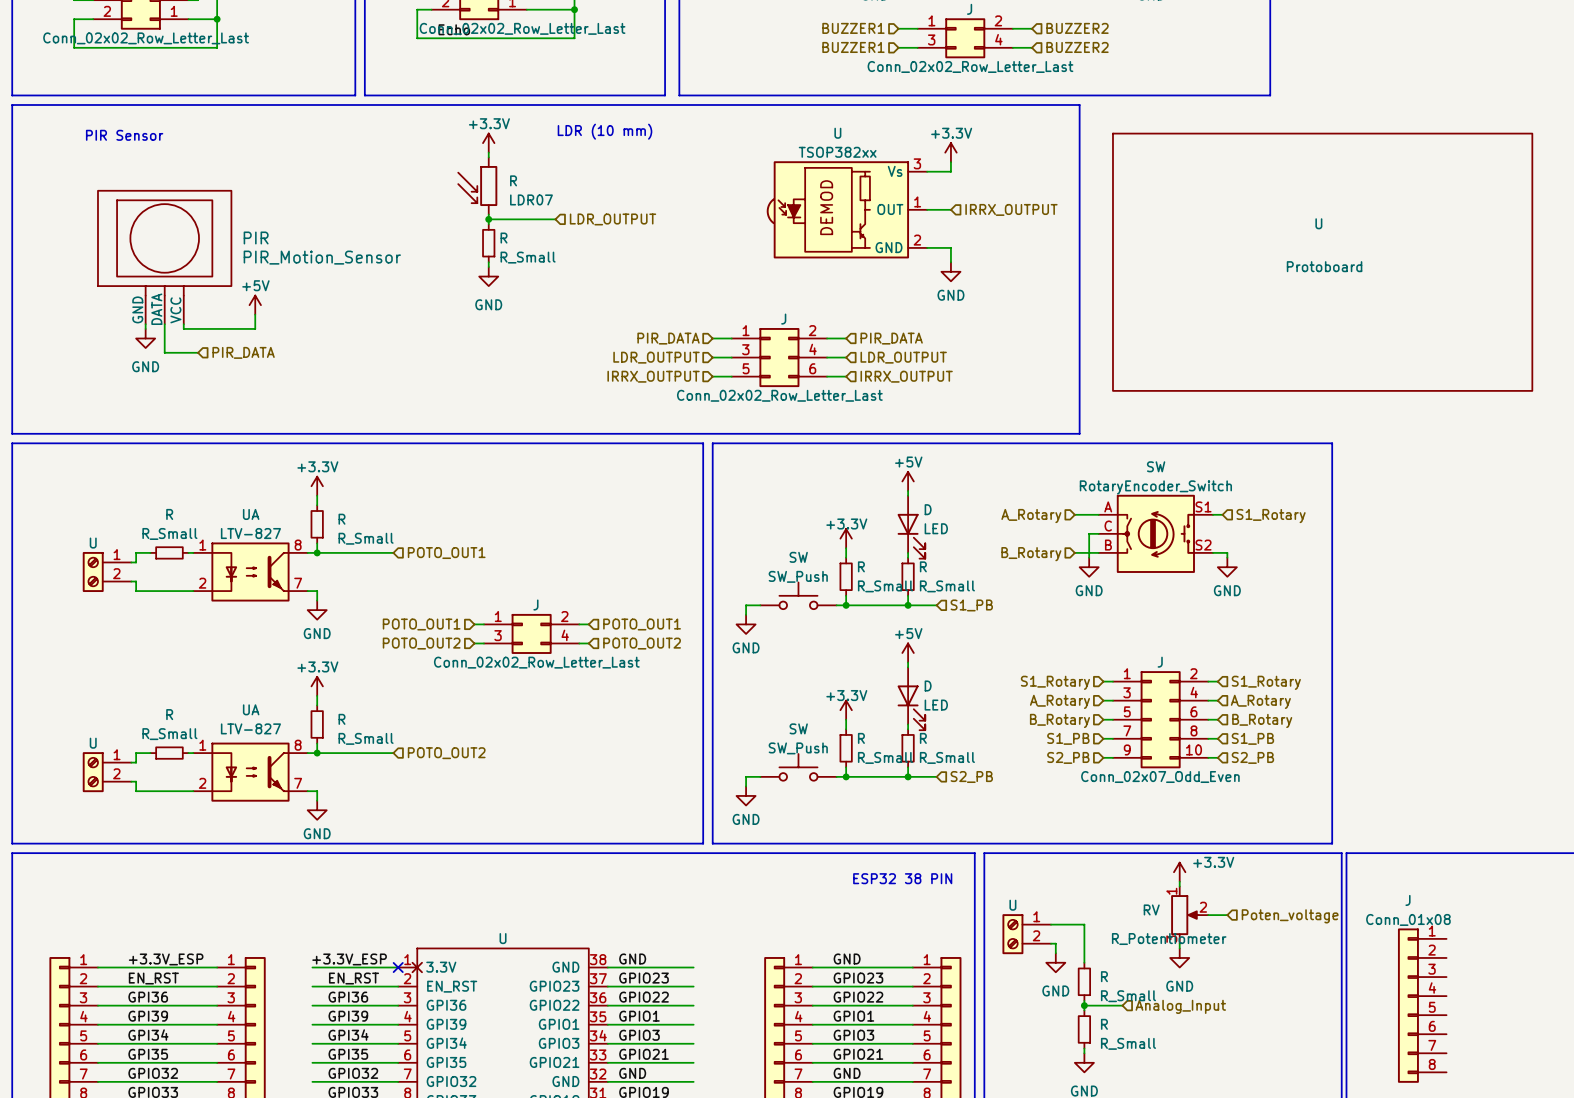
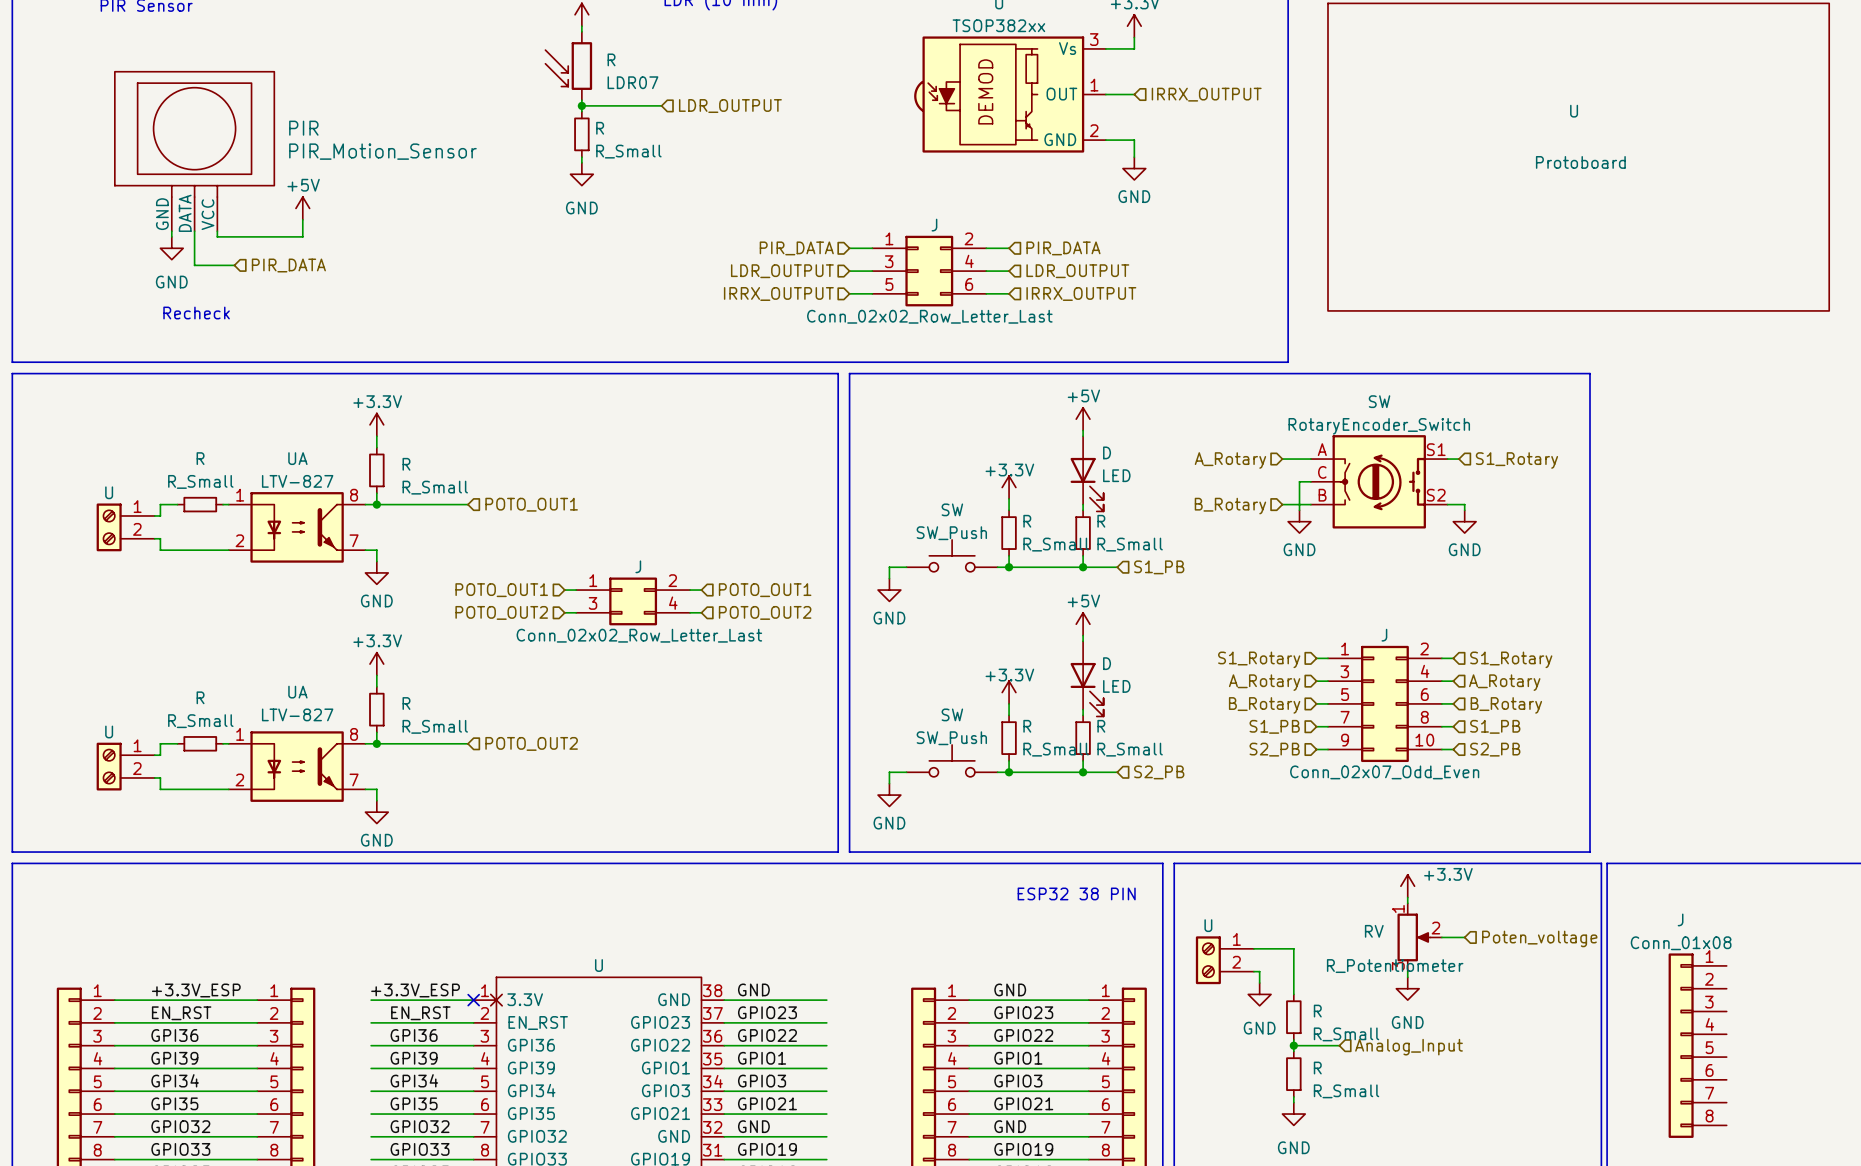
text: none -> Recheck (196, 313)

